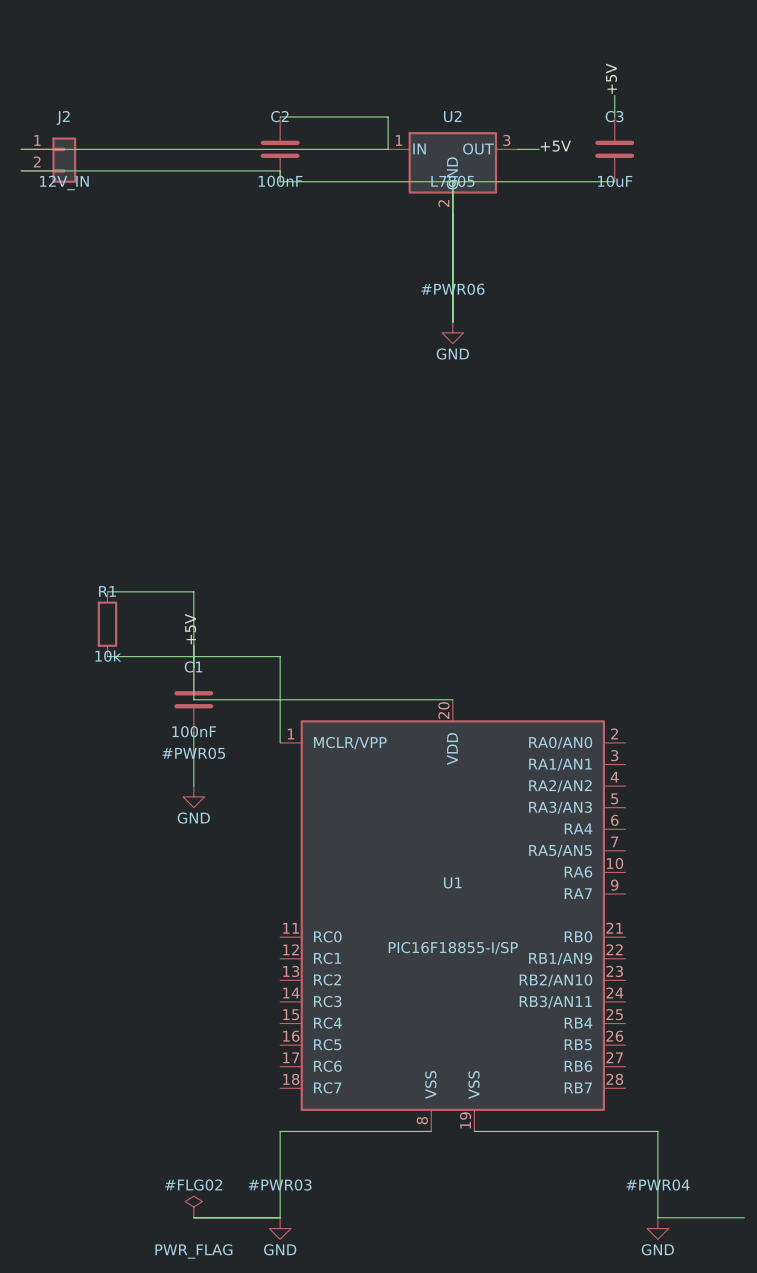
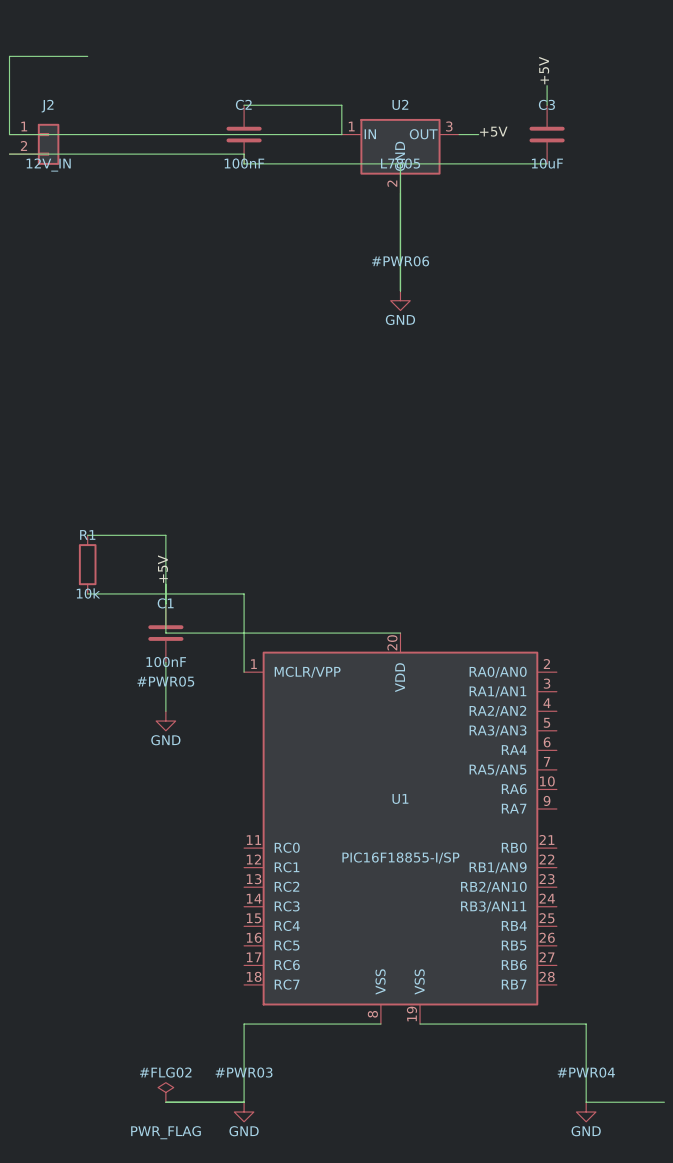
wire: none -> (87, 56) (9, 56) (9, 134)

